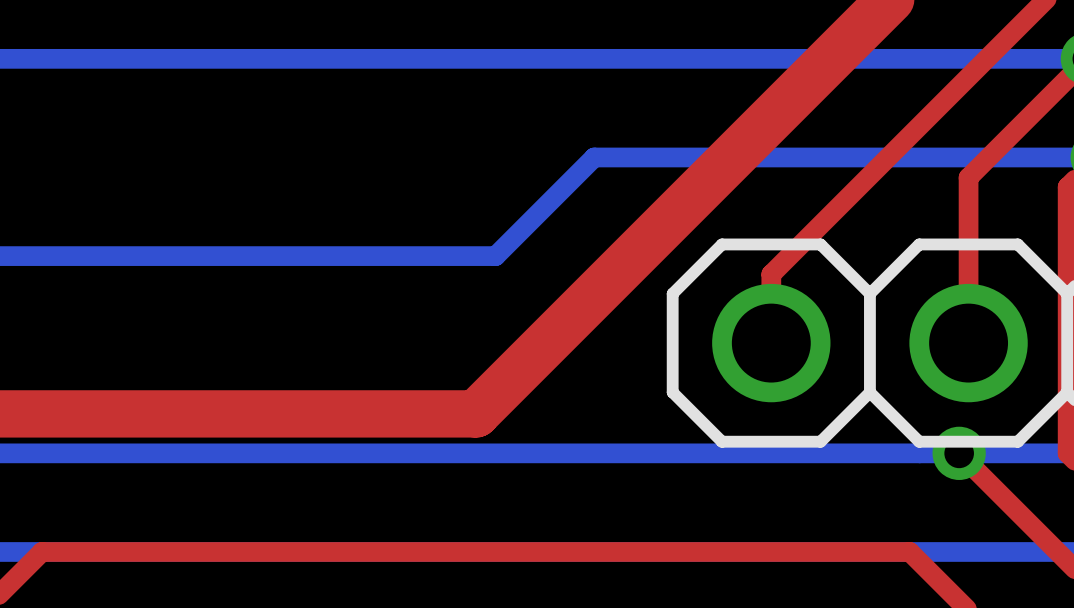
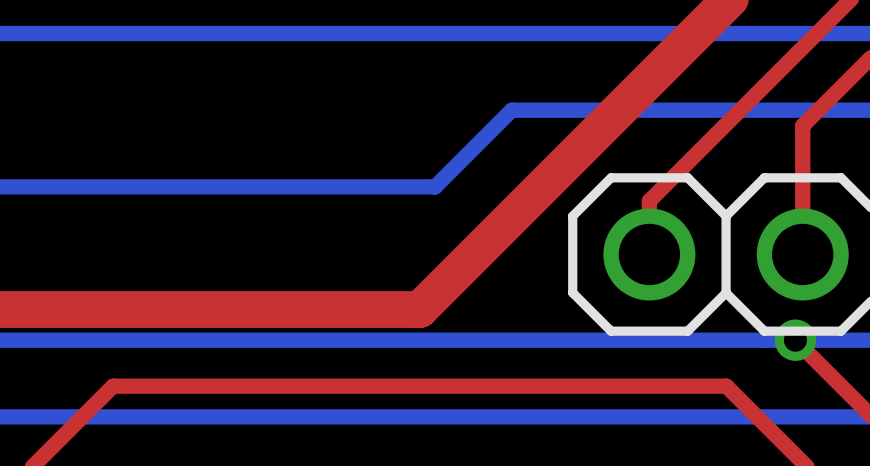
top track: (41, 551) (909, 551) -> (82, 416) (113, 386) (726, 386) (757, 416)

